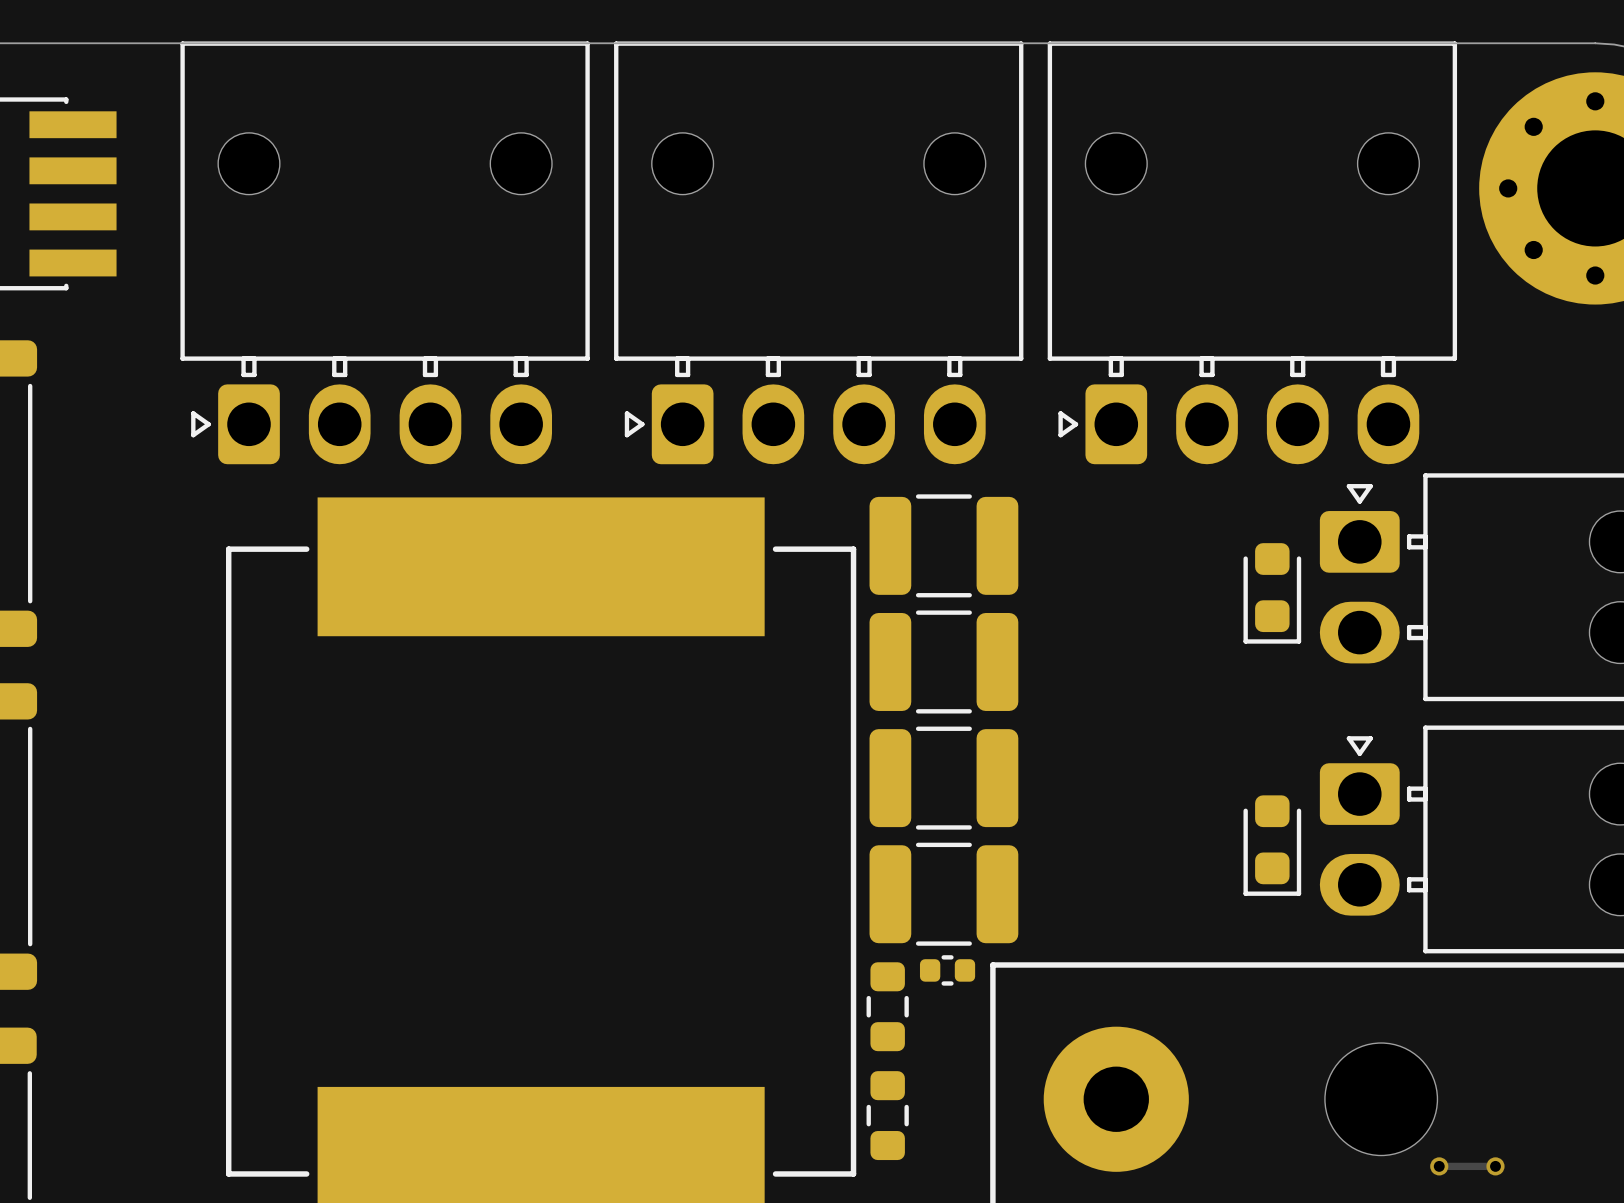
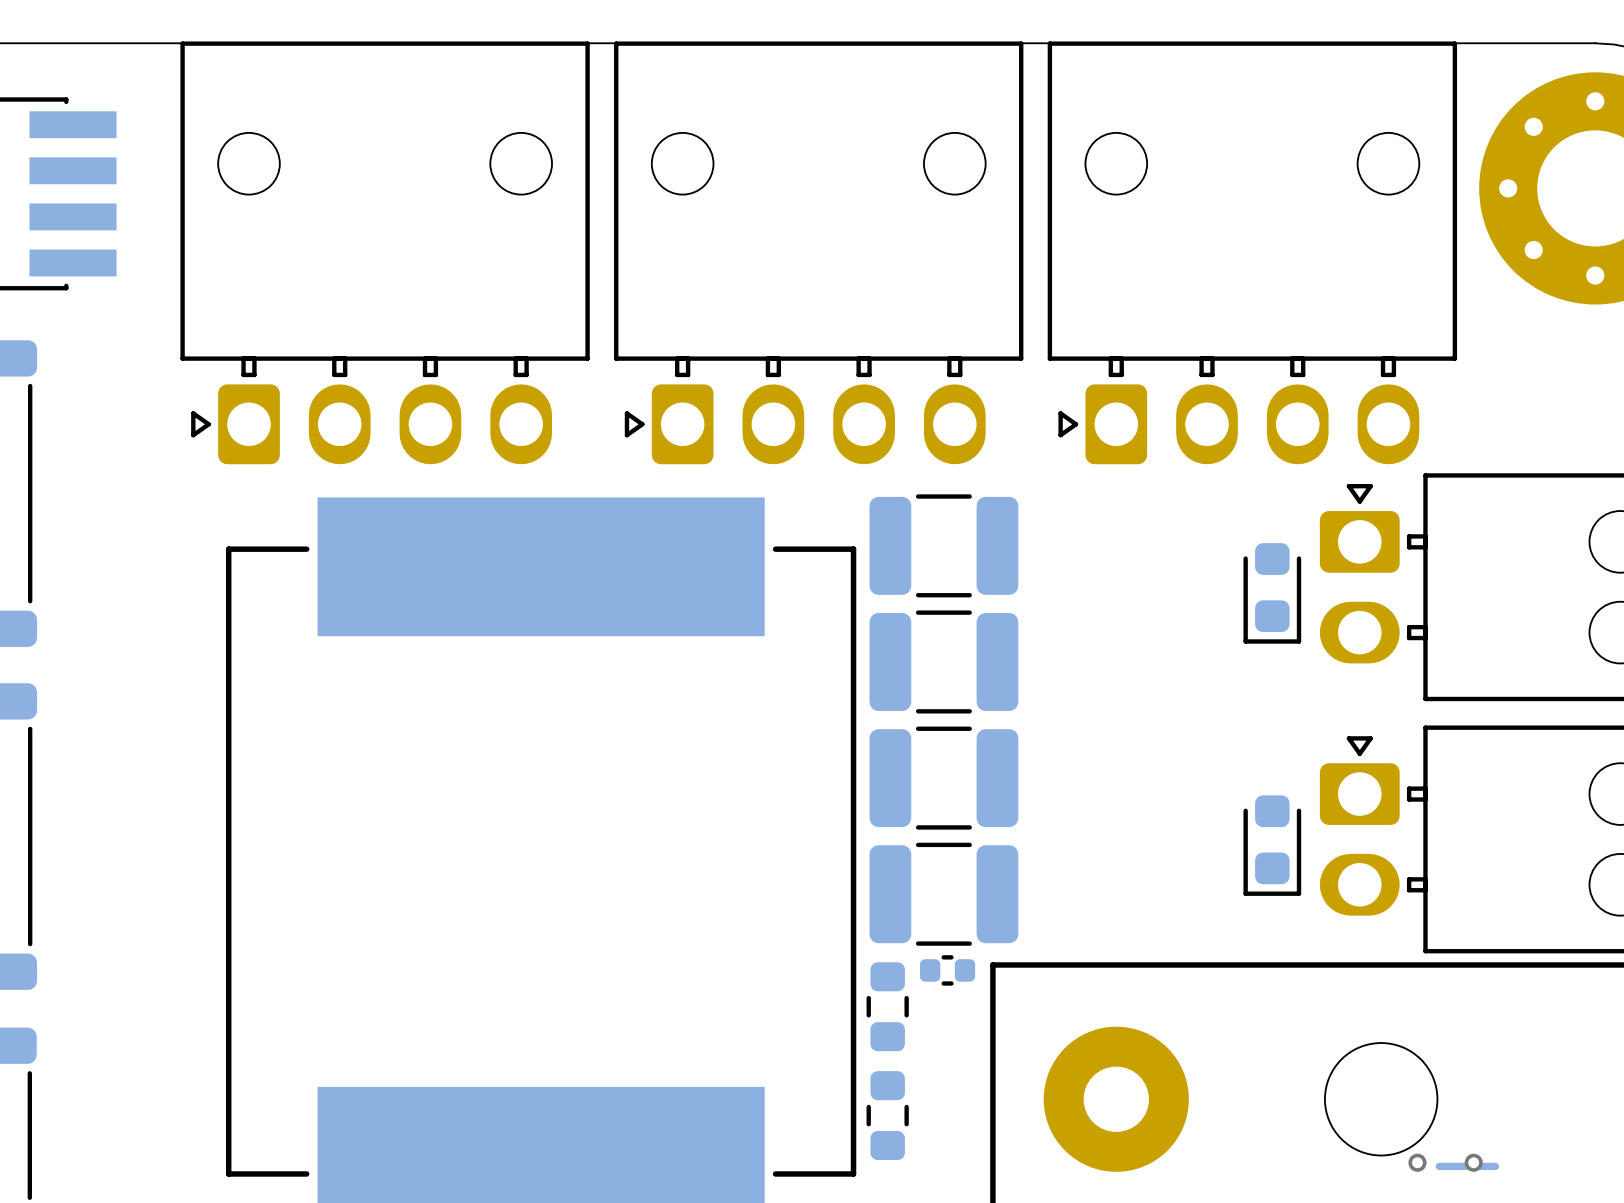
via: none -> (1417, 1162)
via: none -> (1473, 1162)
via: (1439, 1166) -> none
via: (1495, 1166) -> none

